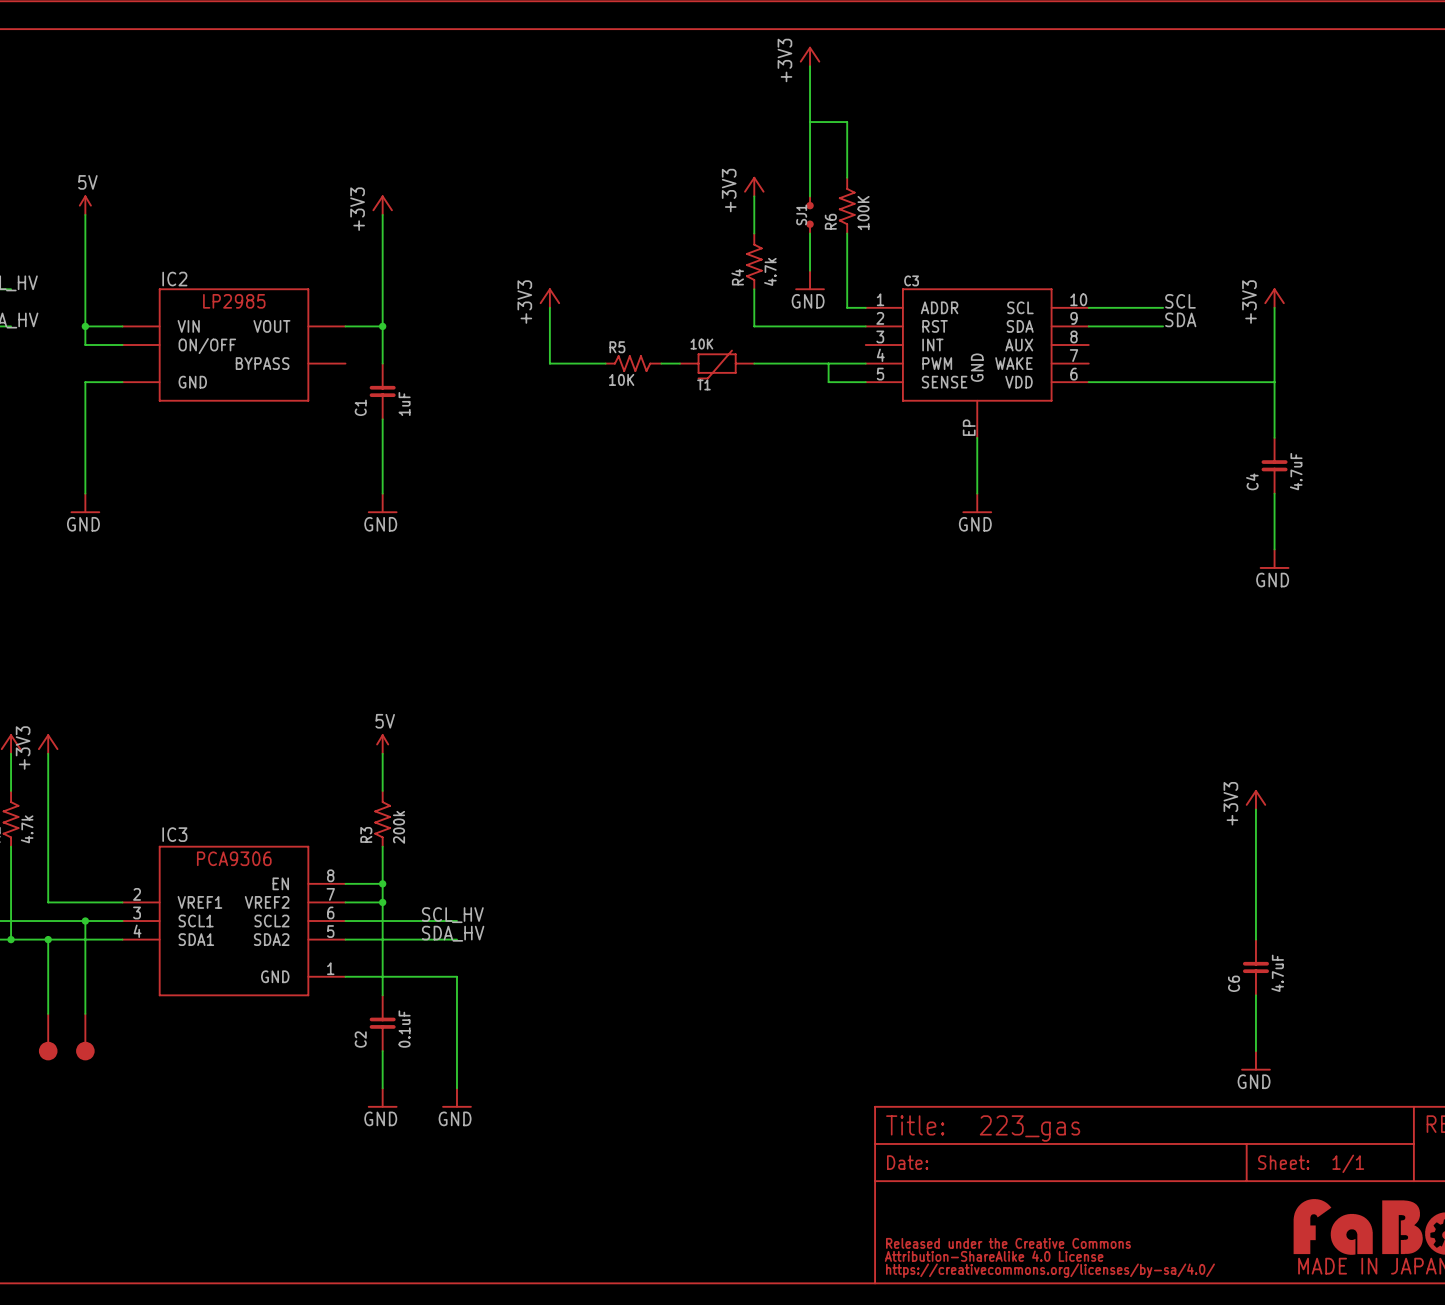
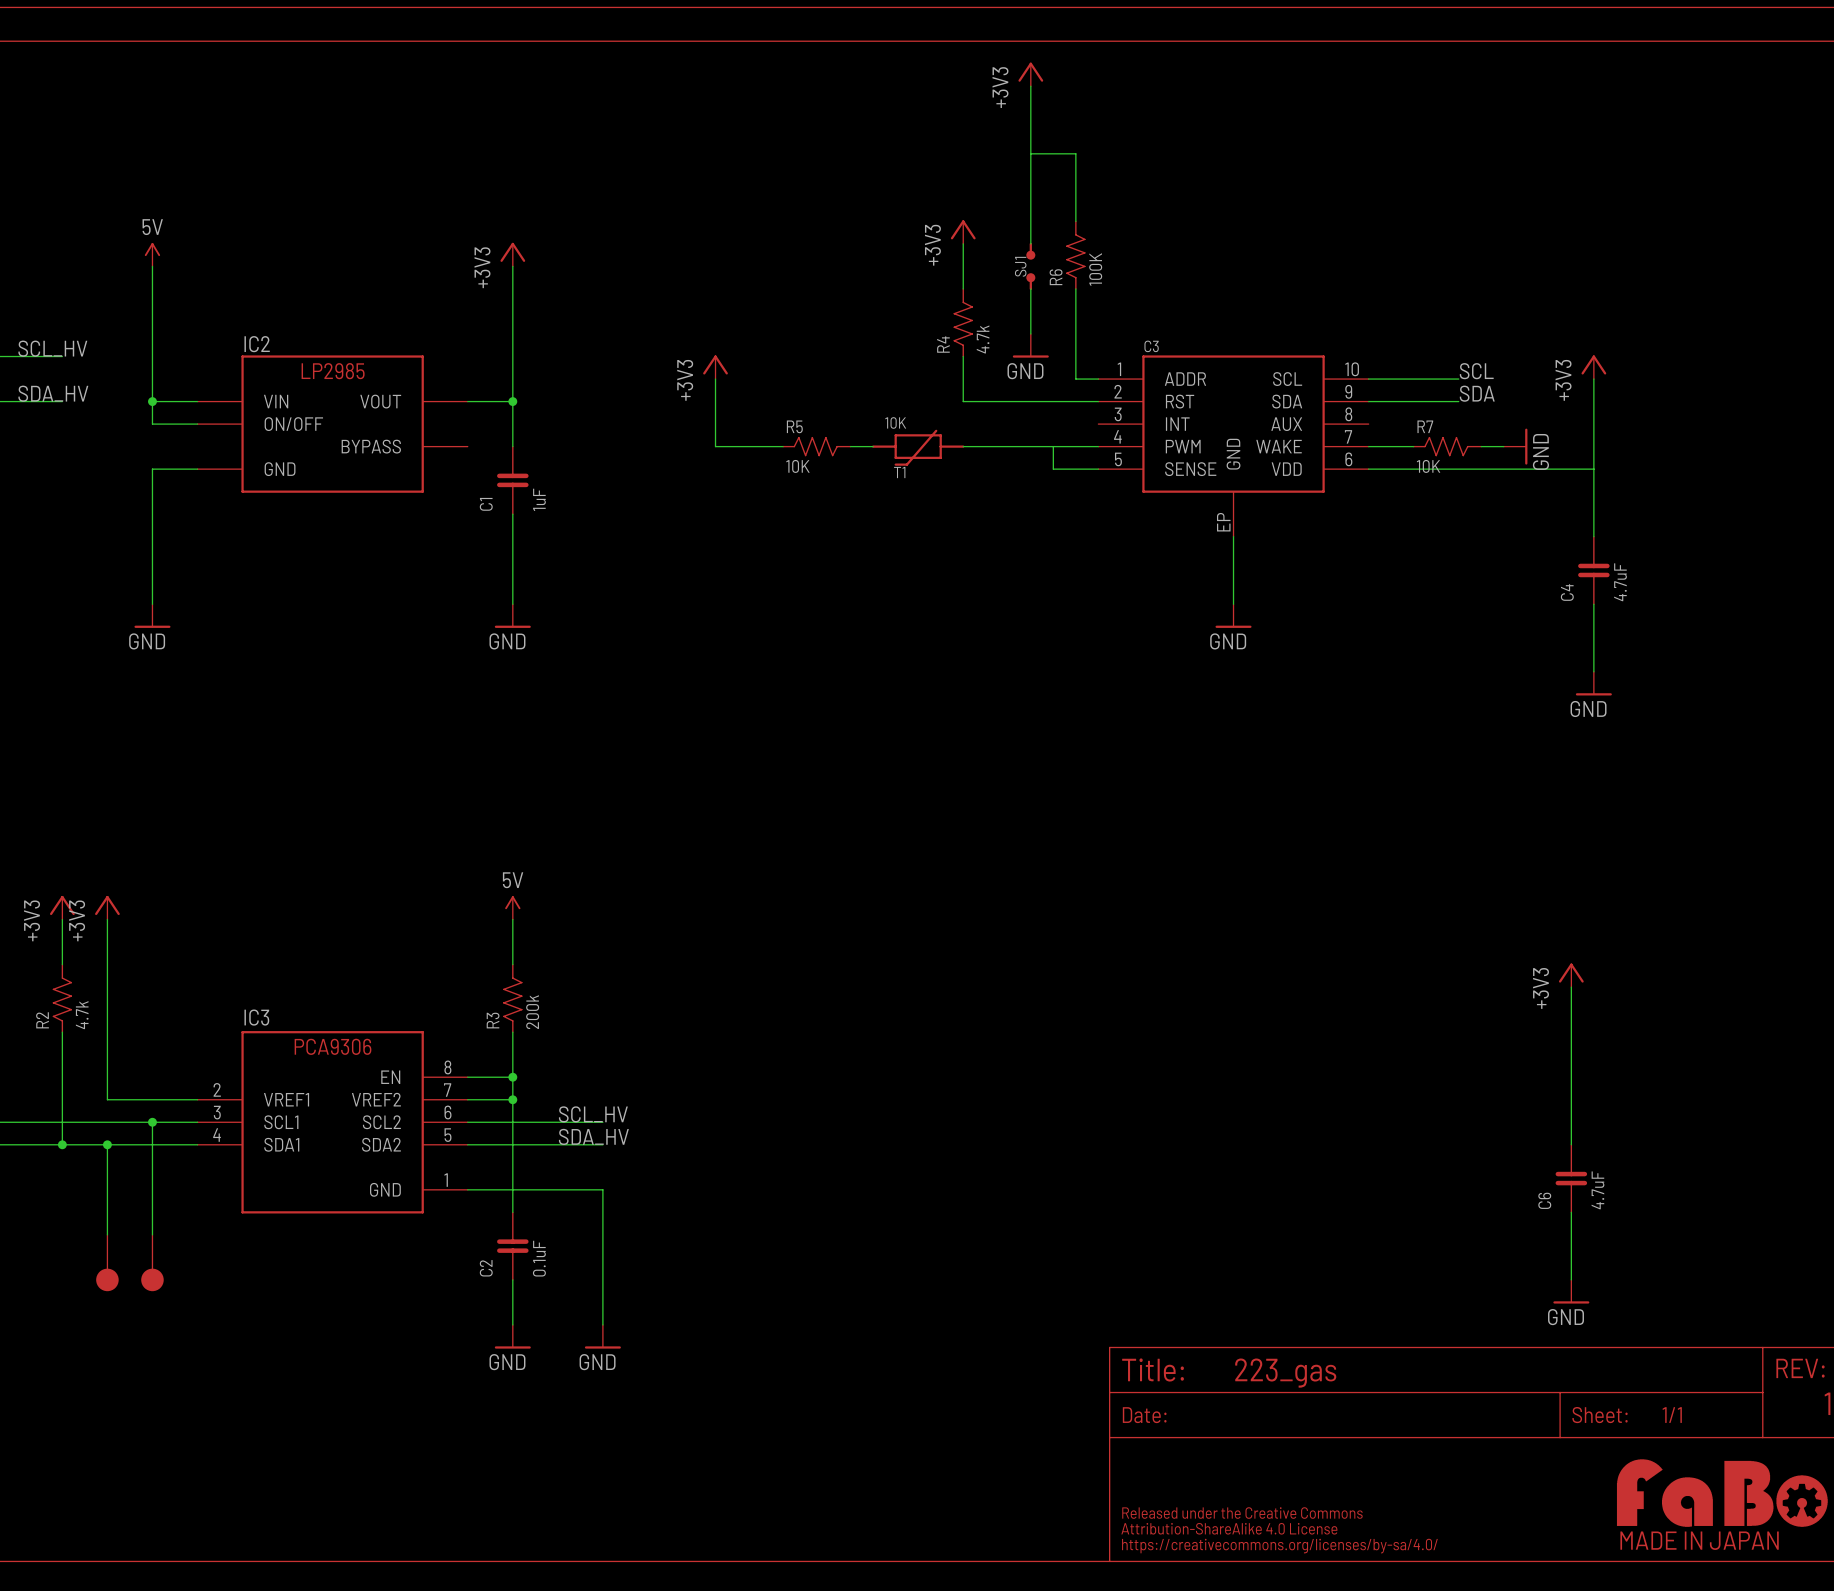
wire: none -> (1368, 446) (1413, 446)
R7: none -> 10K (1447, 446)
wire: none -> (1481, 446) (1503, 446)
power symbol: none -> GND (1515, 446)

